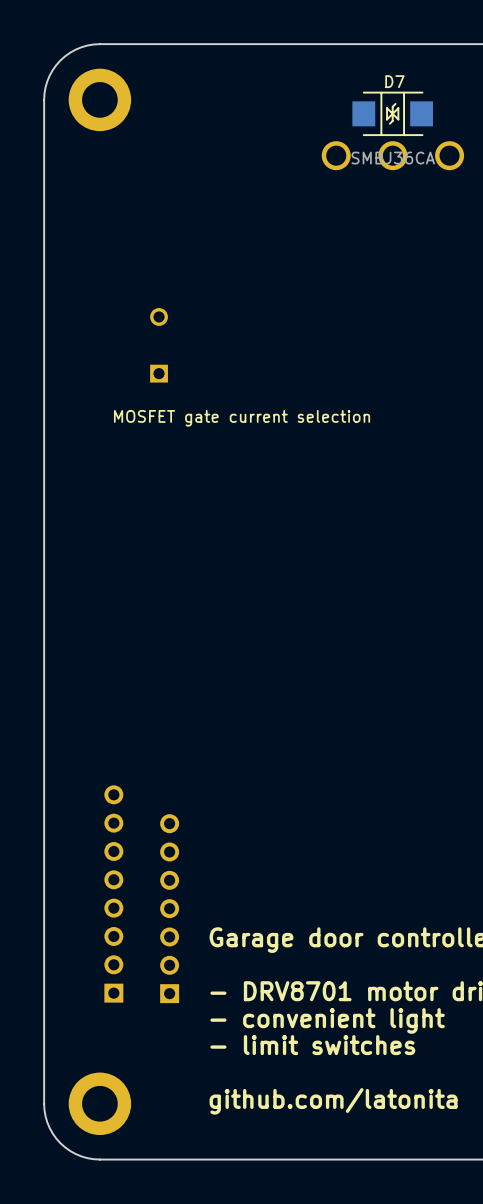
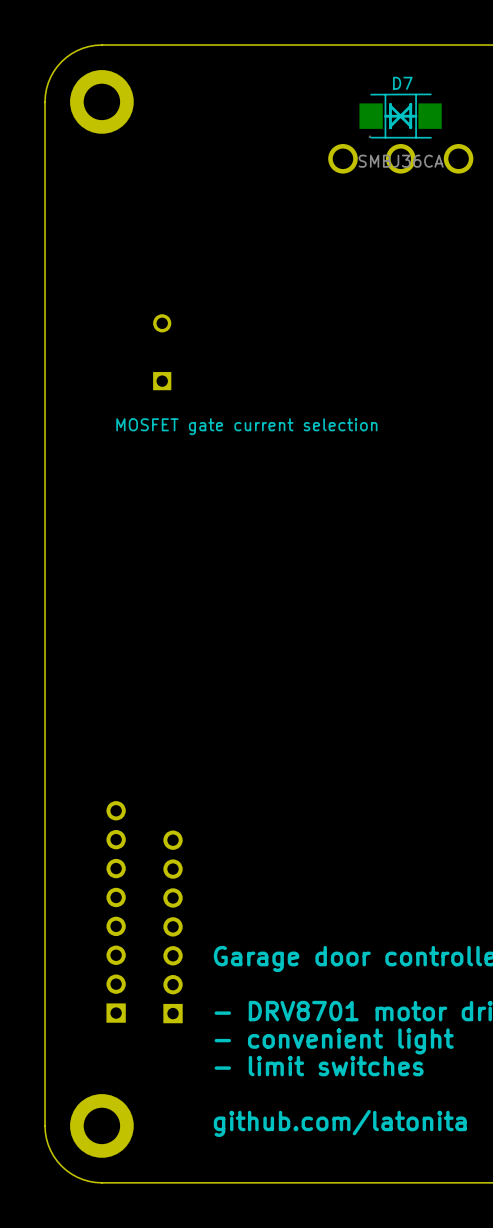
D7 footprint: [352, 91, 434, 136] -> [359, 93, 442, 139]

